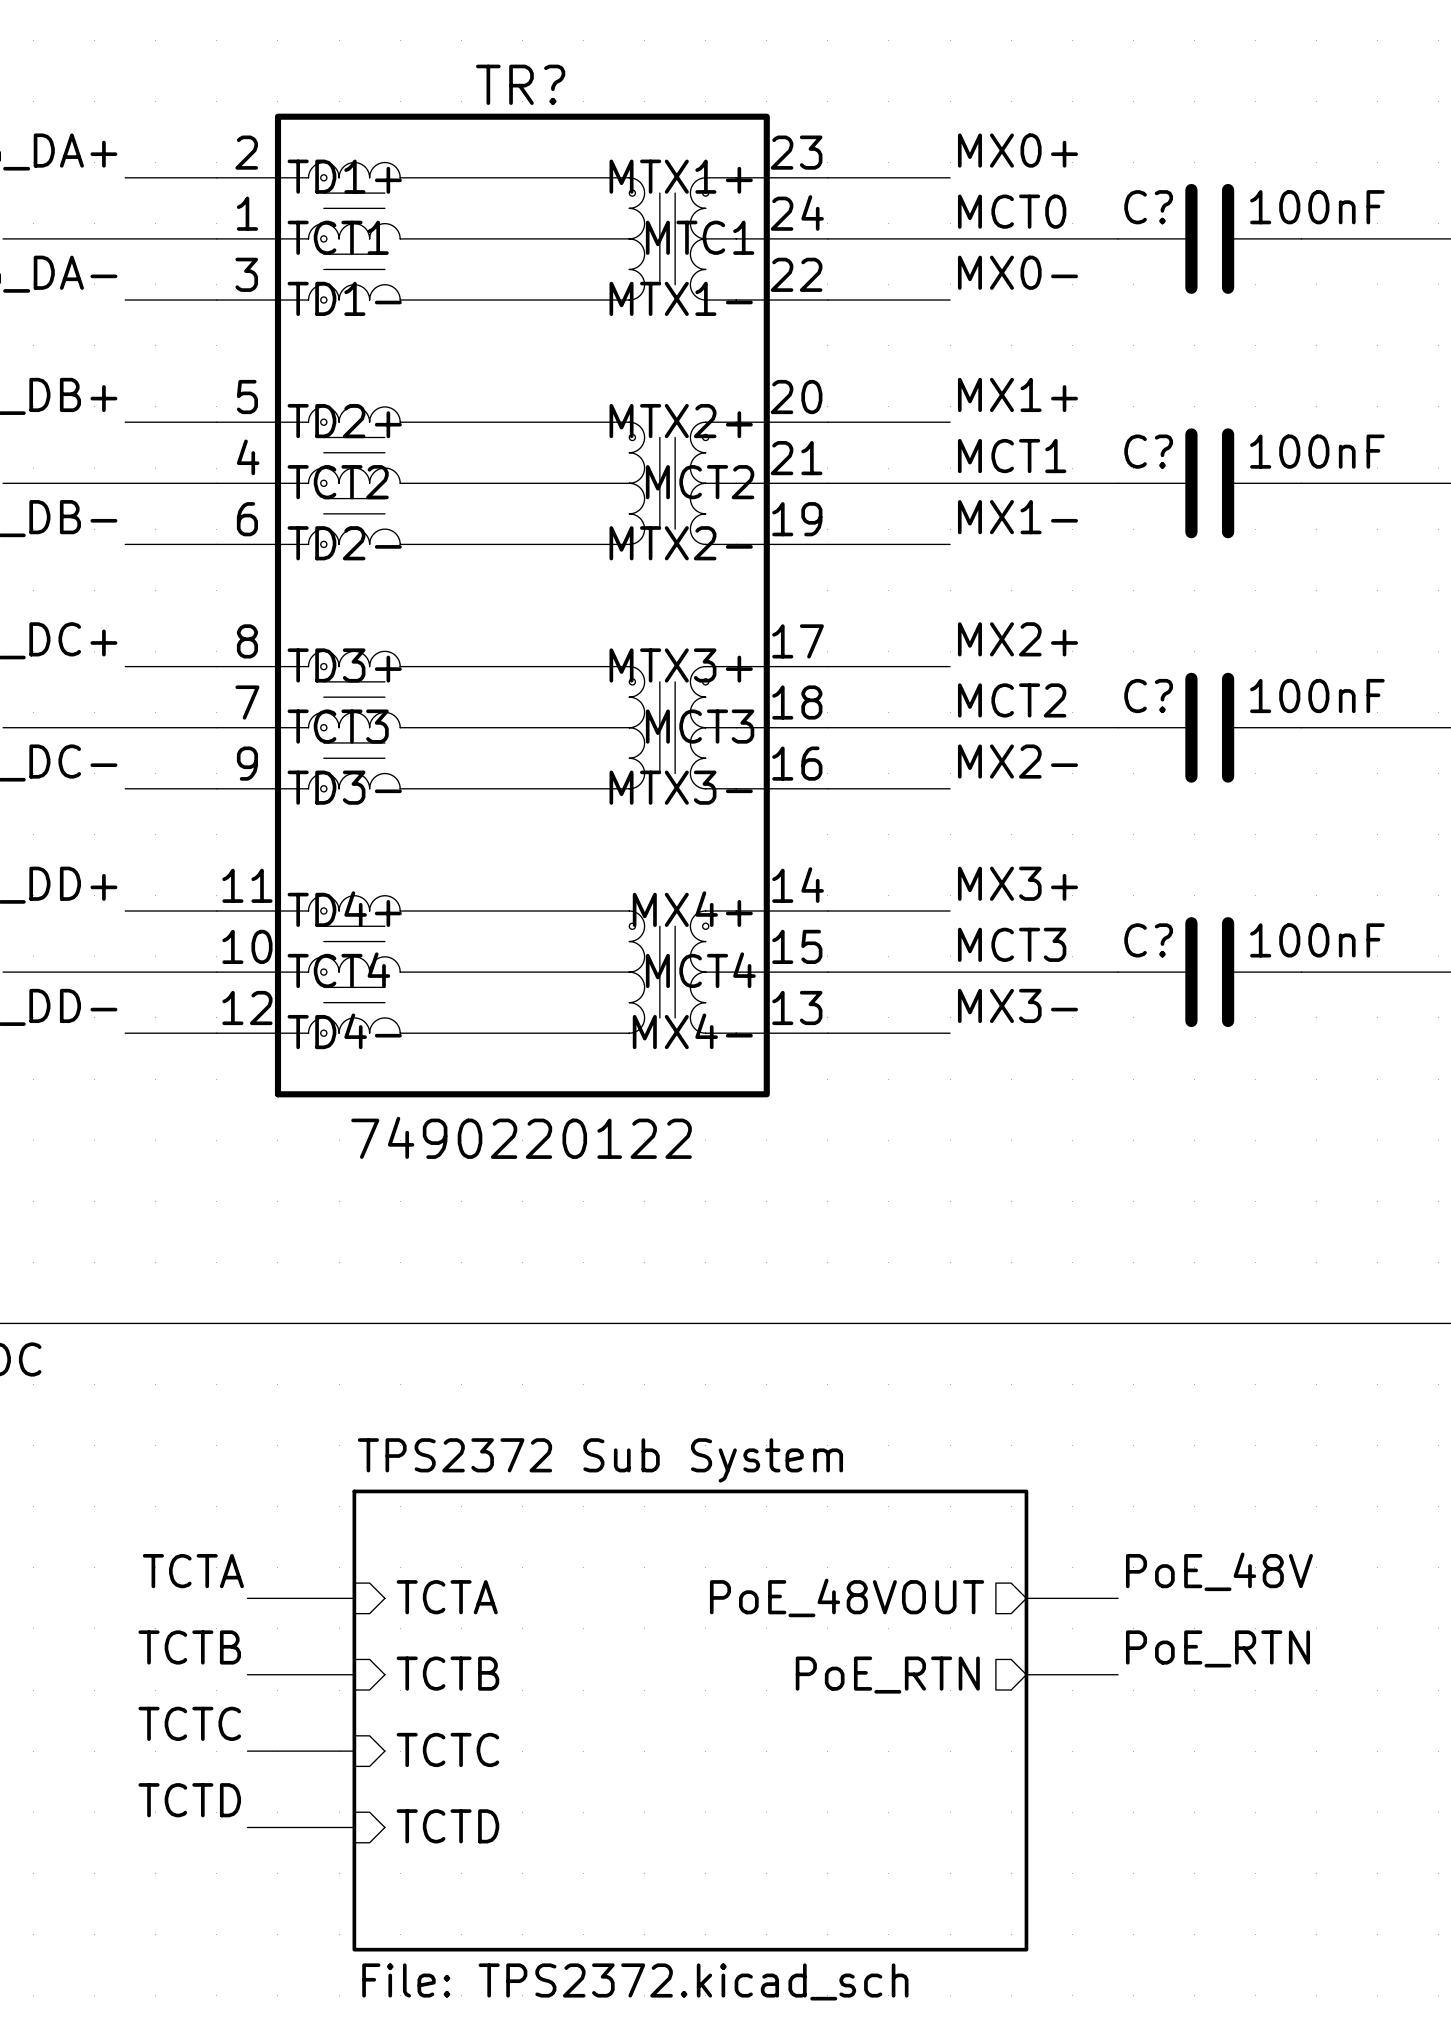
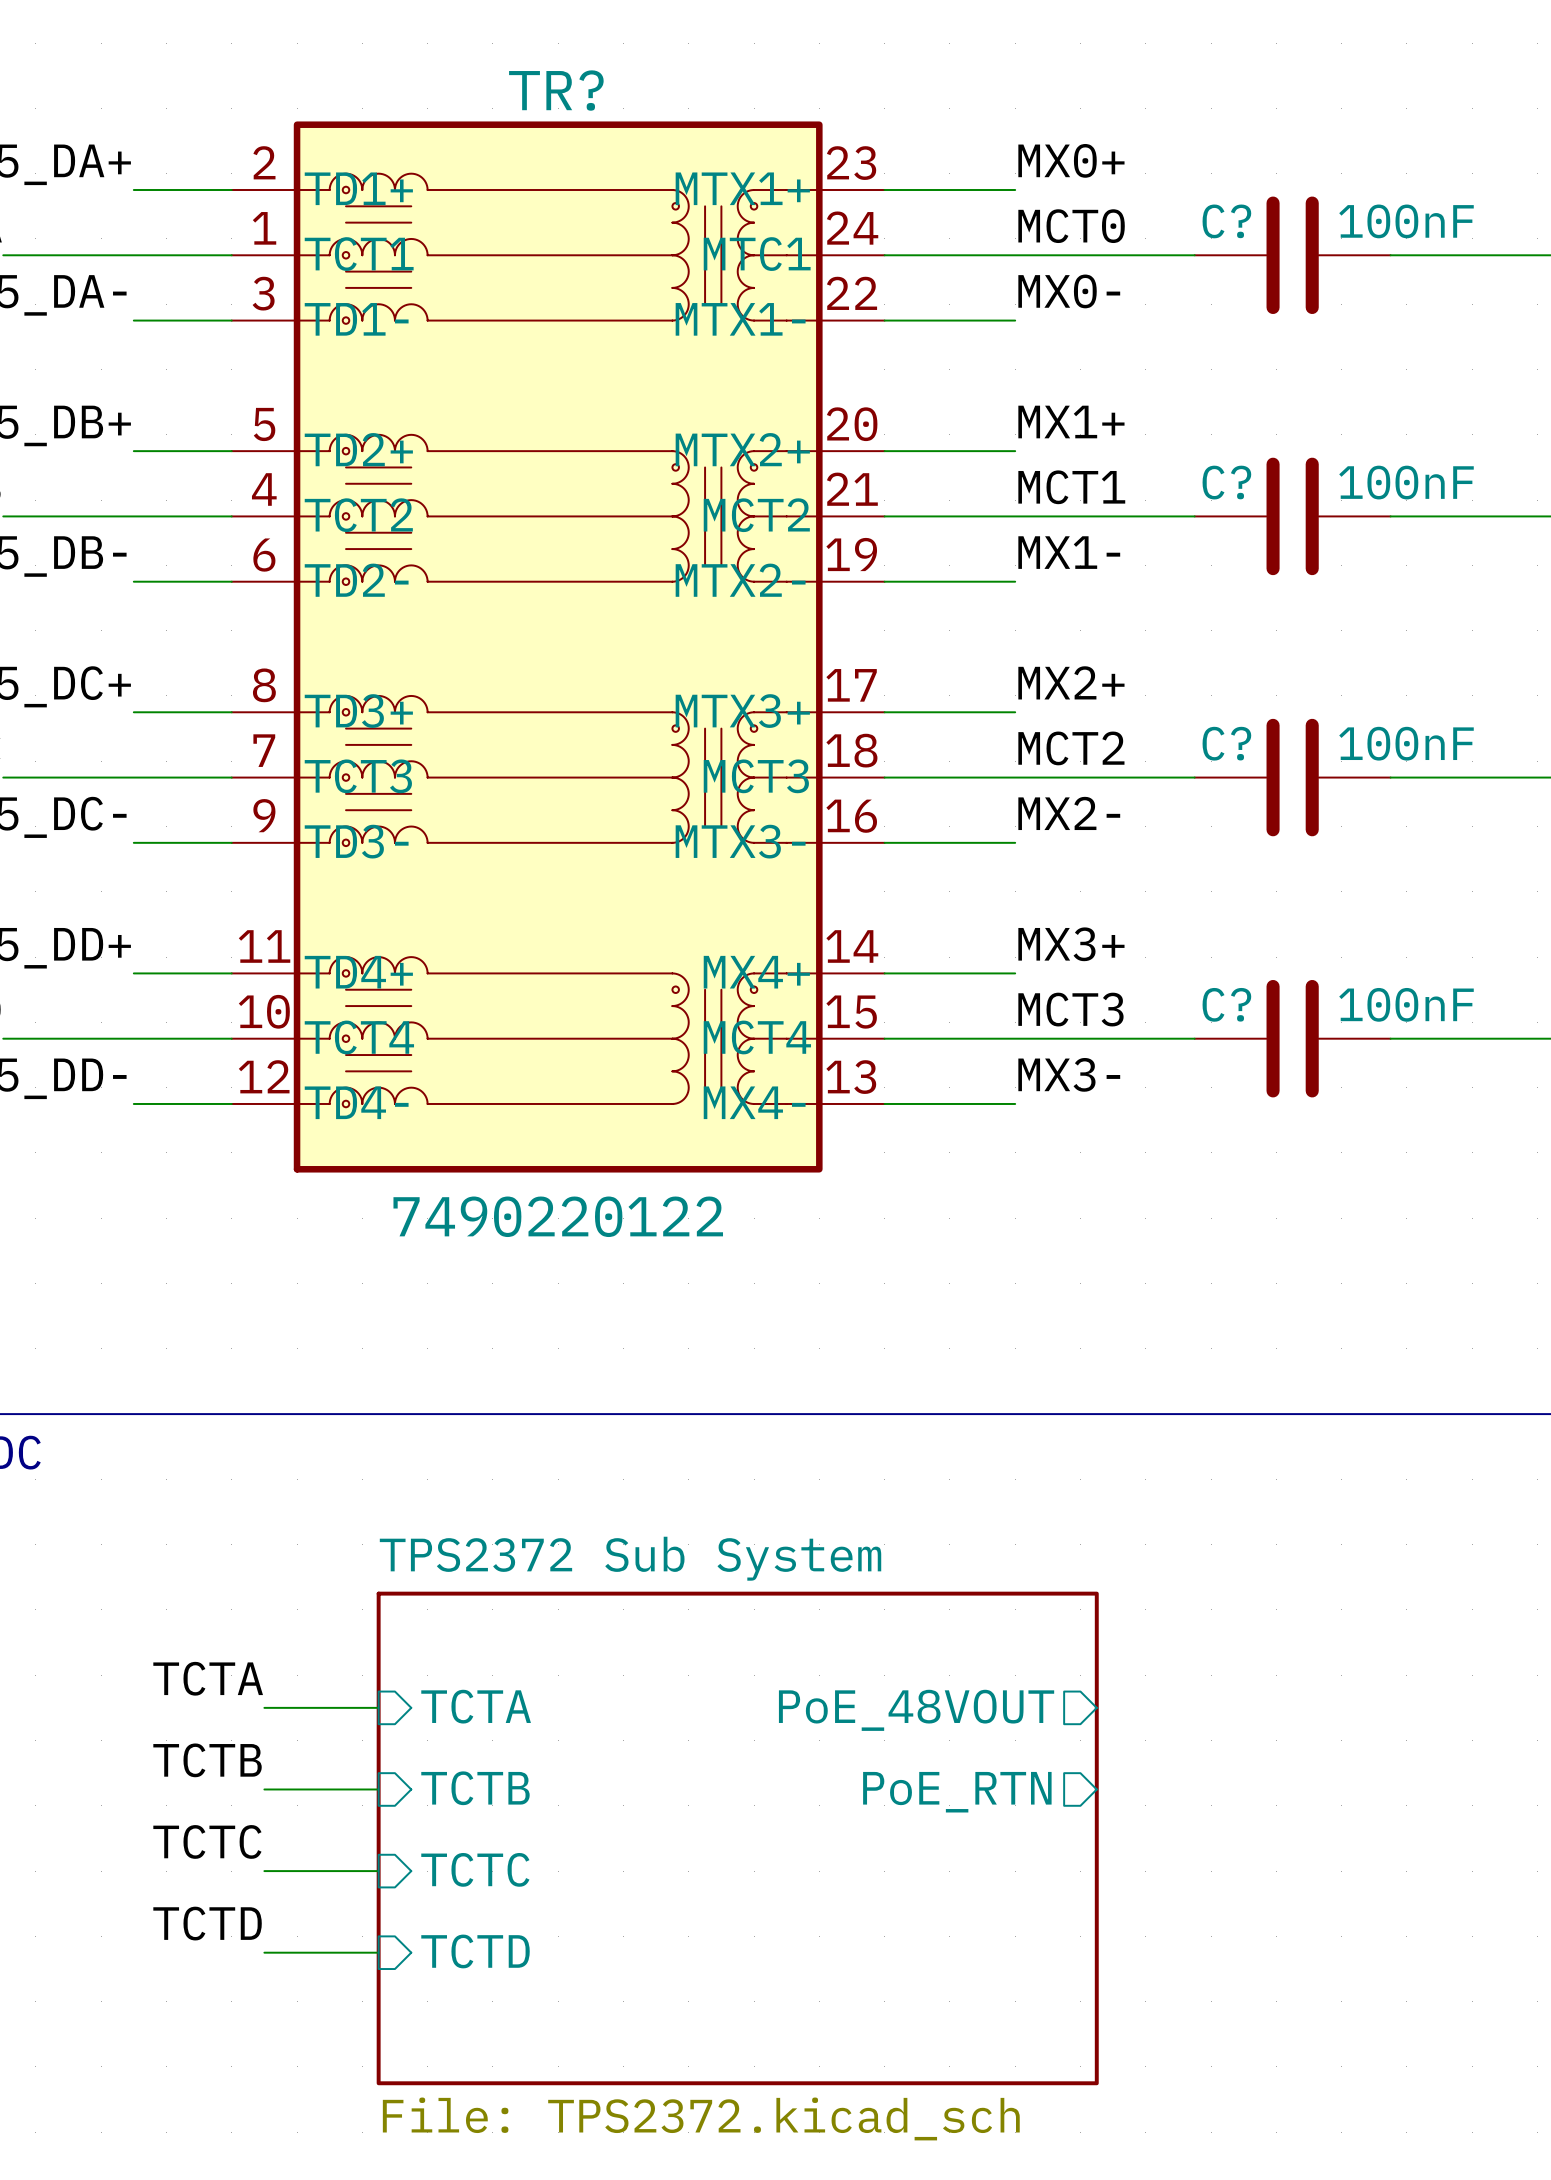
label: PoE_48V (1219, 1571) -> none
wire: (1026, 1598) (1118, 1598) -> none
label: PoE_RTN (1217, 1648) -> none
wire: (1026, 1674) (1118, 1674) -> none

